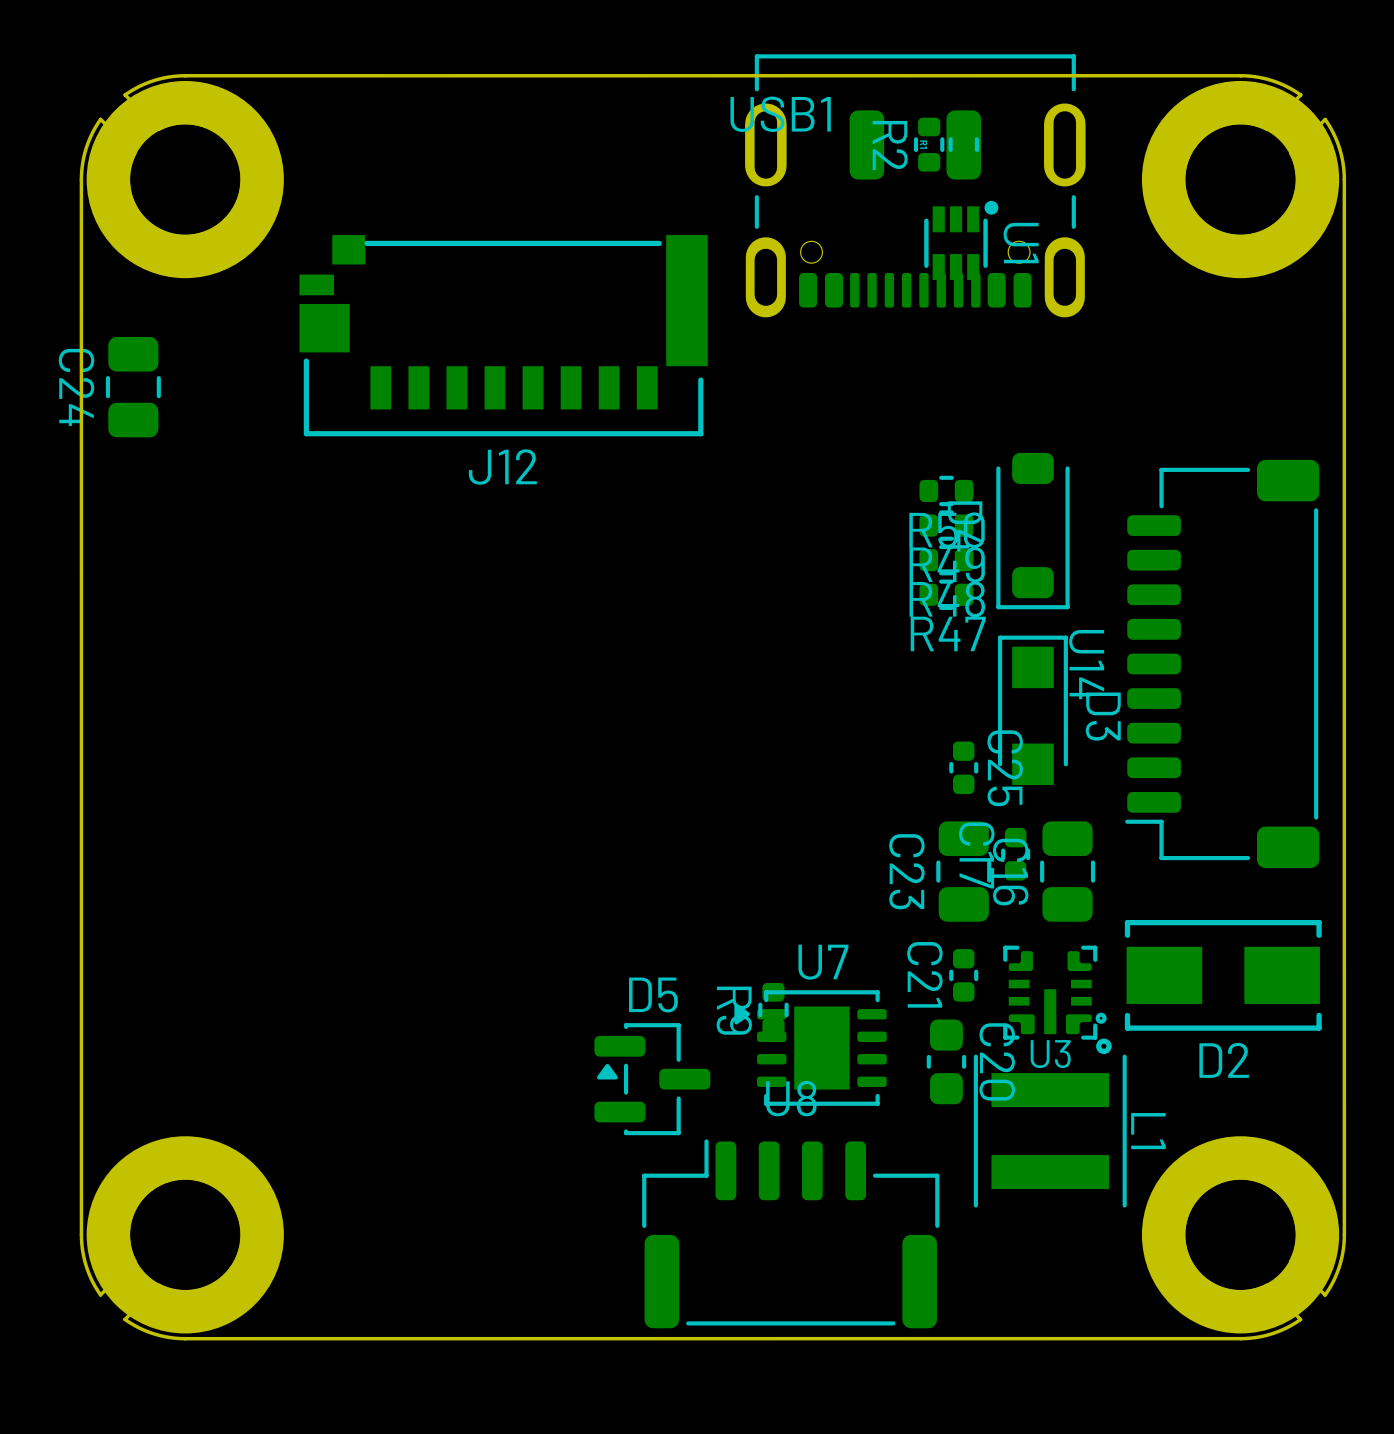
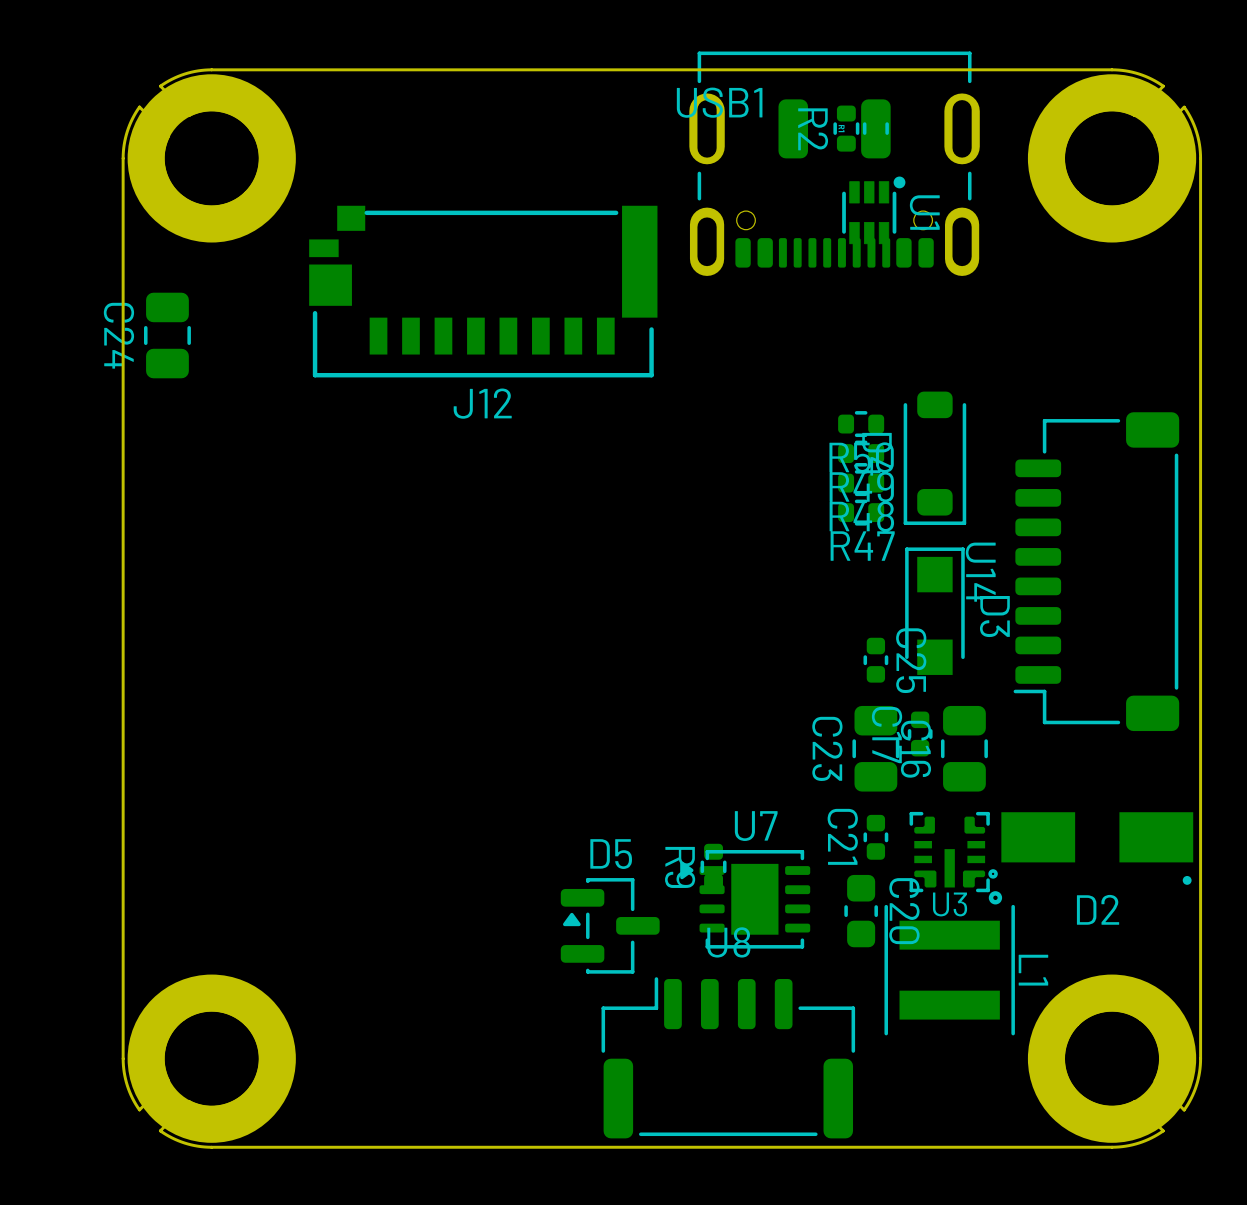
U14 footprint: [1125, 459, 1320, 869] -> [1013, 412, 1180, 732]
D2 footprint: [1124, 919, 1322, 1031] -> [1001, 812, 1194, 885]

